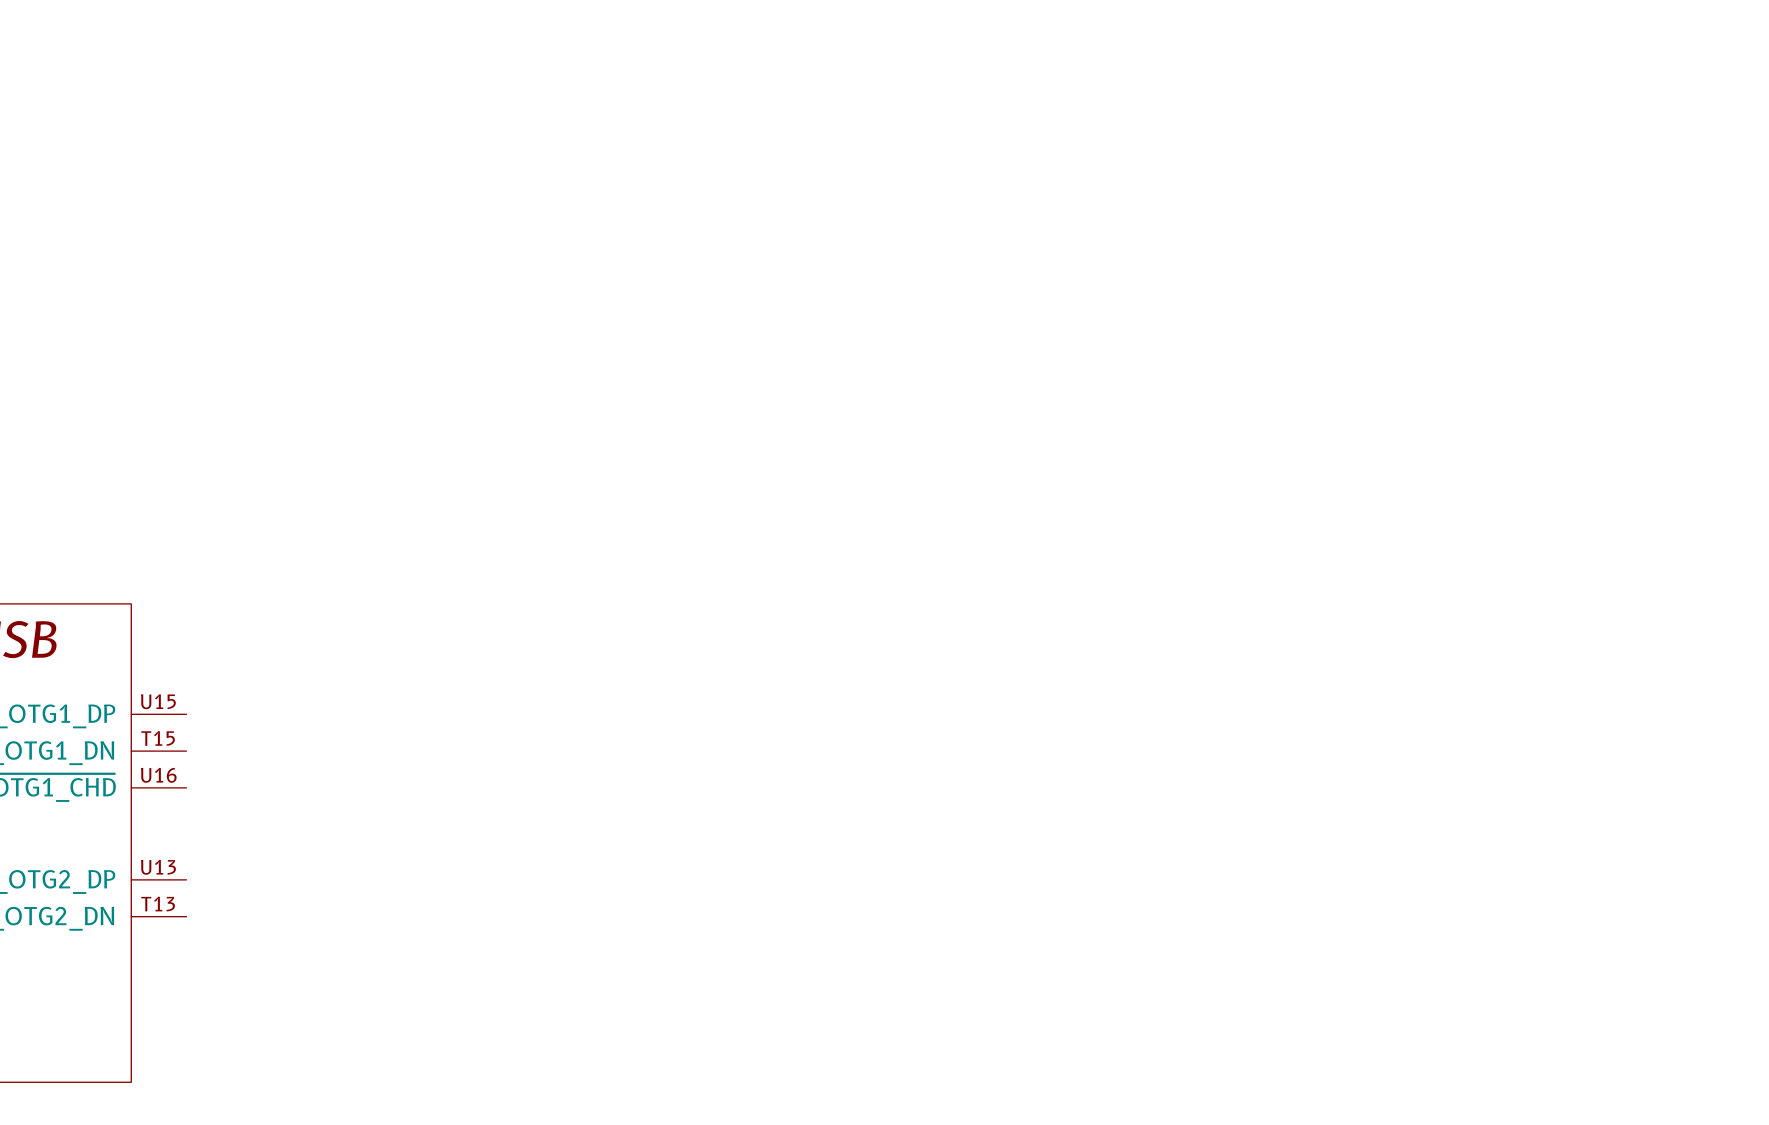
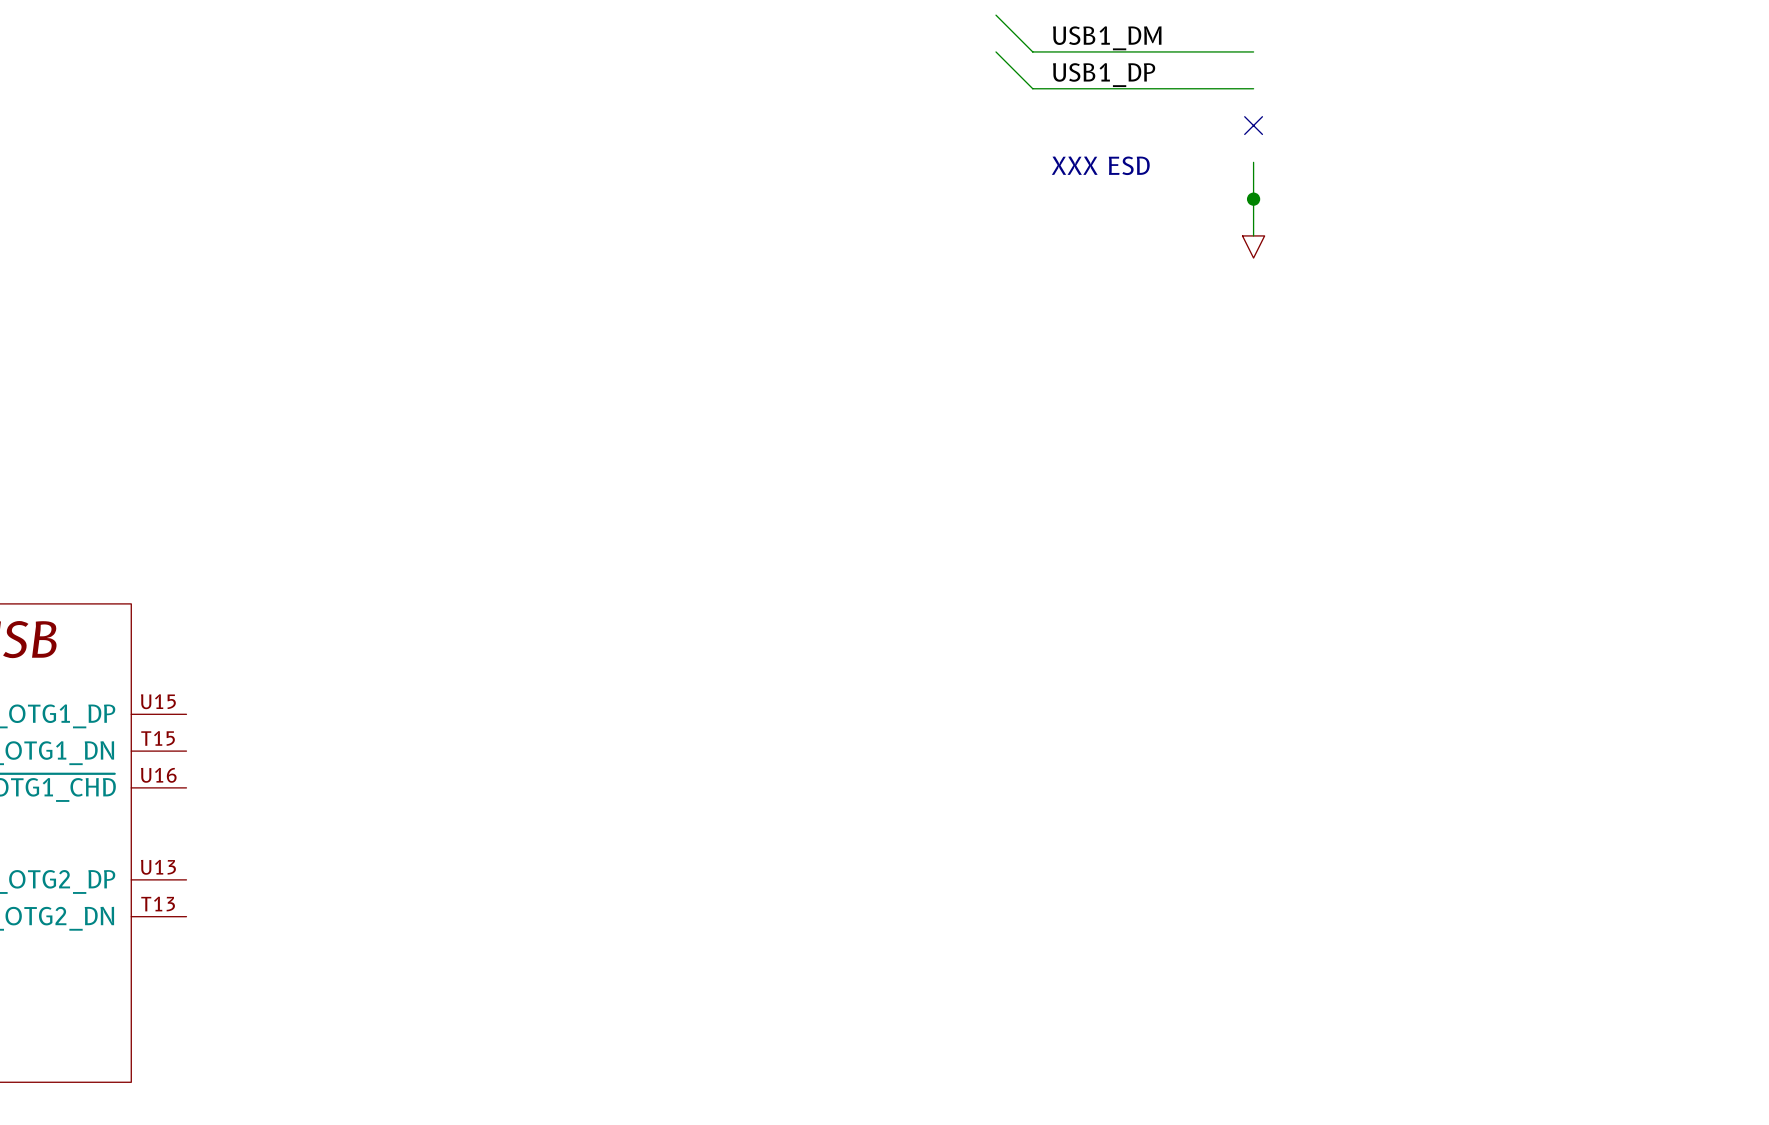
wire: none -> (996, 15) (1032, 51) (1253, 51)
label: none -> USB1_DM (1107, 38)
wire: none -> (996, 51) (1032, 88) (1253, 88)
label: none -> USB1_DP (1104, 75)
no-connect mark: none -> (1253, 125)
wire: none -> (1253, 162) (1253, 235)
text: none -> XXX ESD (1100, 165)
junction: none -> (1253, 199)
power symbol: none -> (1253, 246)

